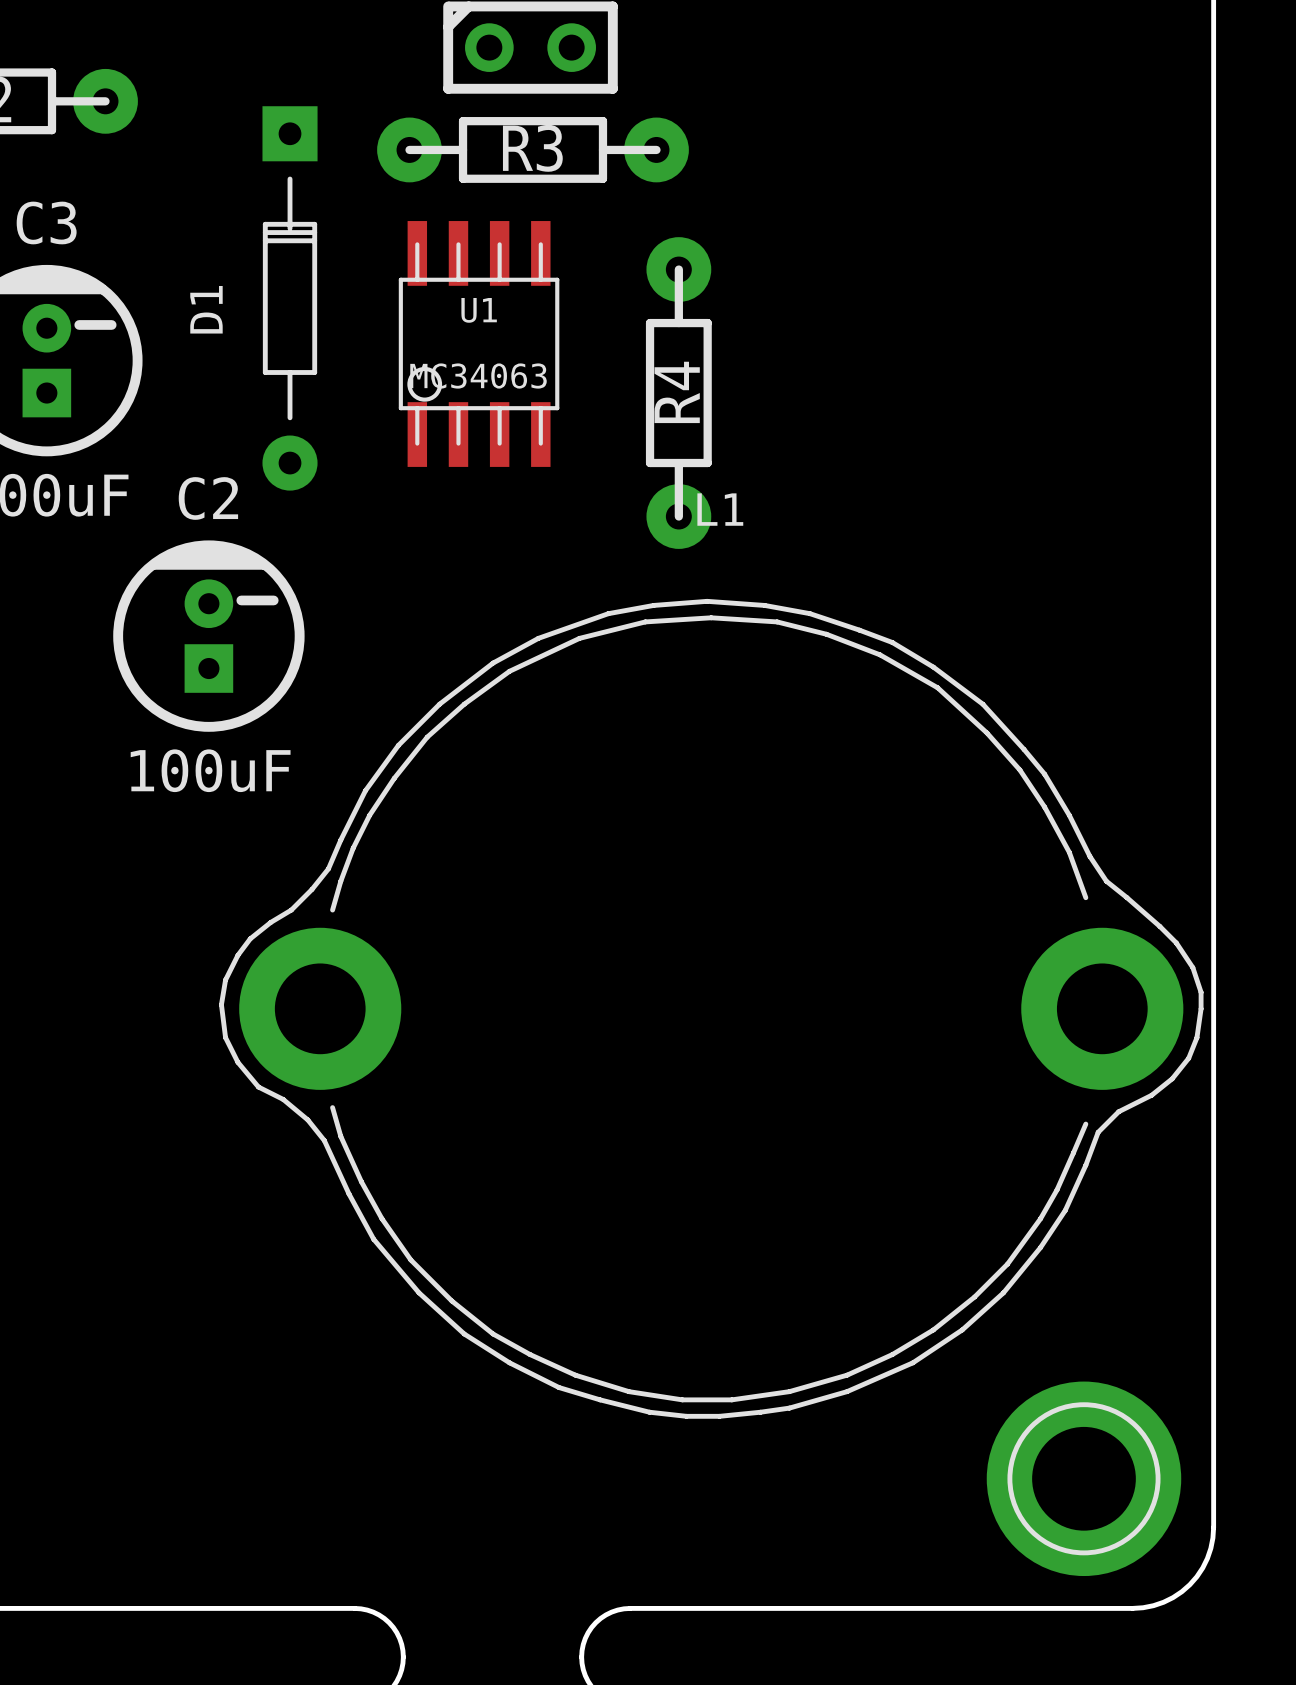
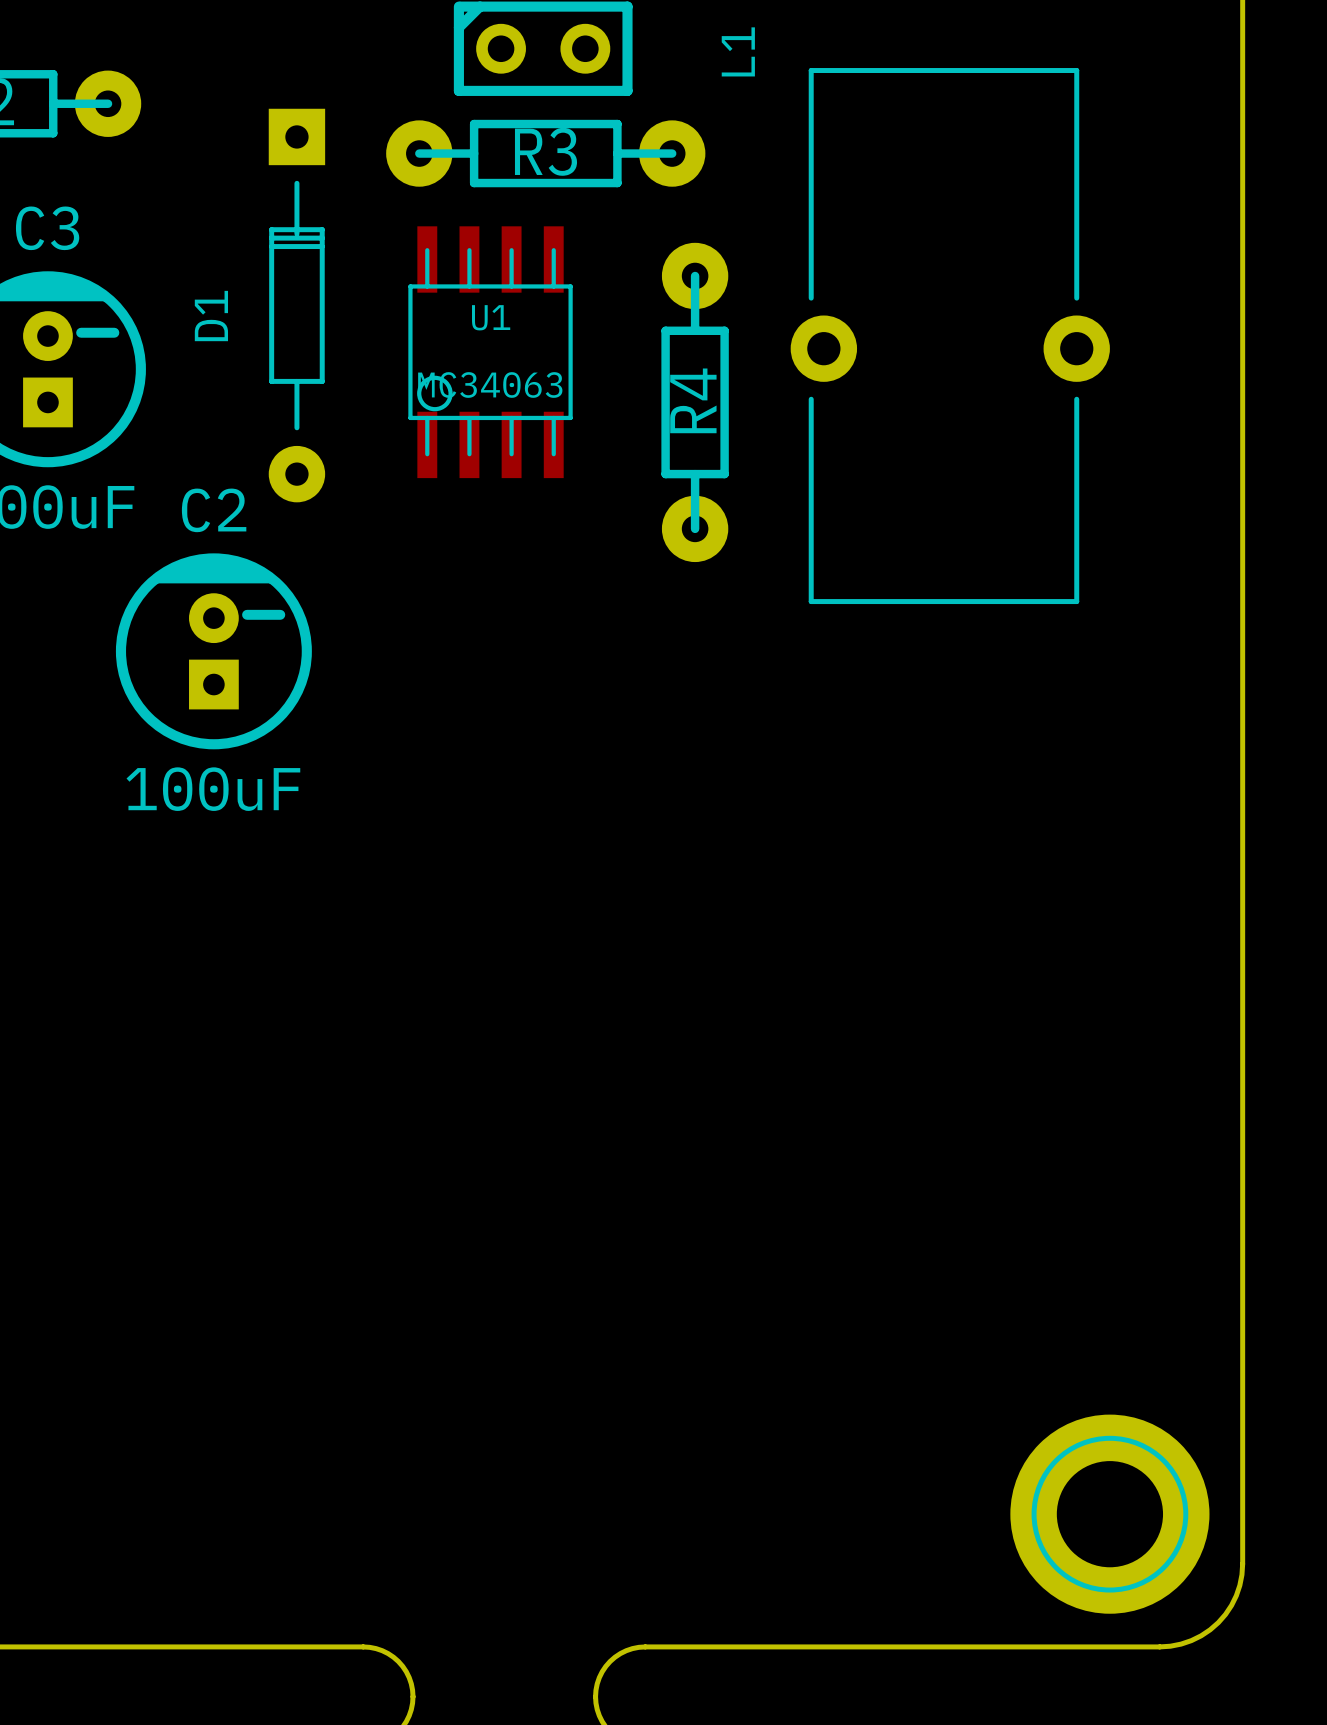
L1 name position: L1 (720, 509) -> L1 (738, 51)
L1 footprint: [219, 598, 1204, 1419] -> [790, 68, 1110, 605]

